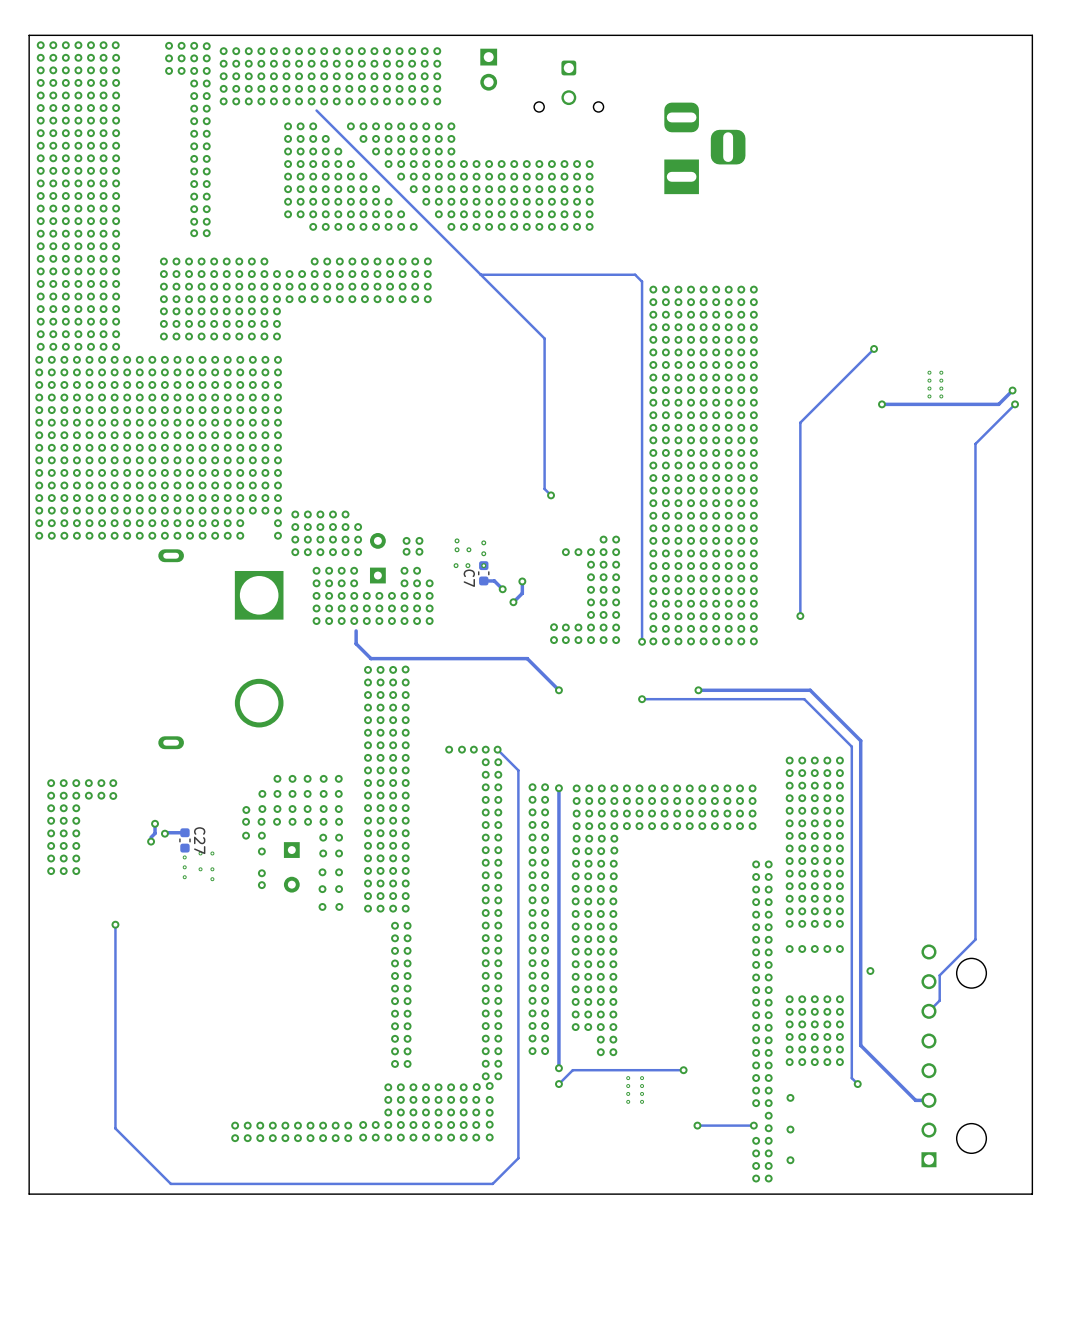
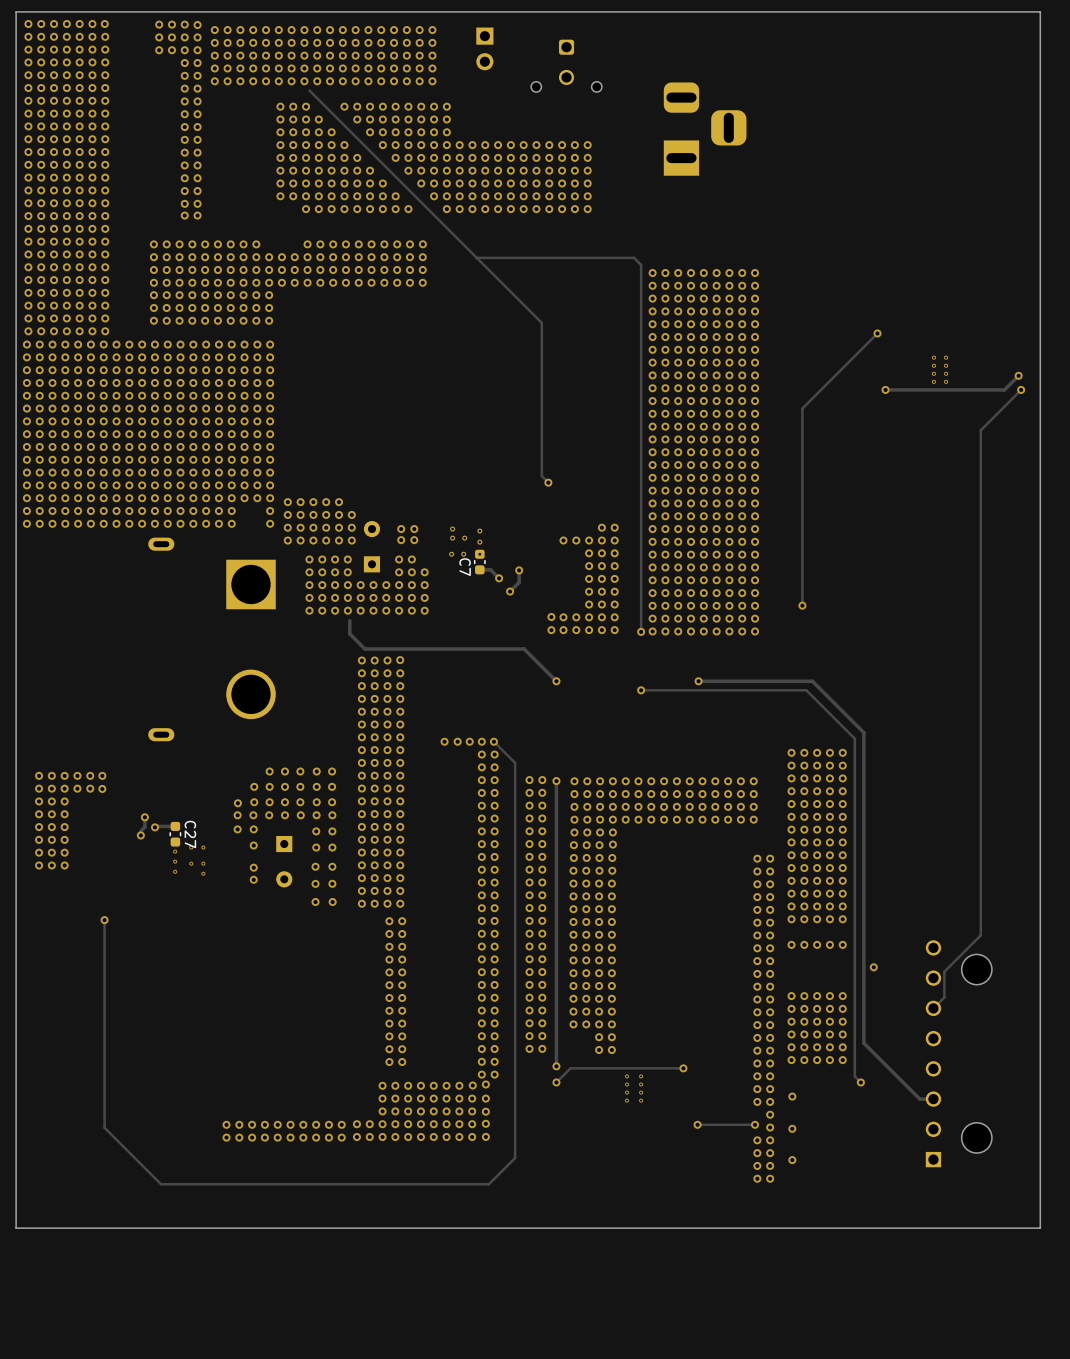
board edge: (1032, 35) (29, 35) (29, 1194) (1032, 1194) (1032, 35) -> (1040, 11) (1040, 1228) (16, 1228) (16, 11) (1040, 11)

